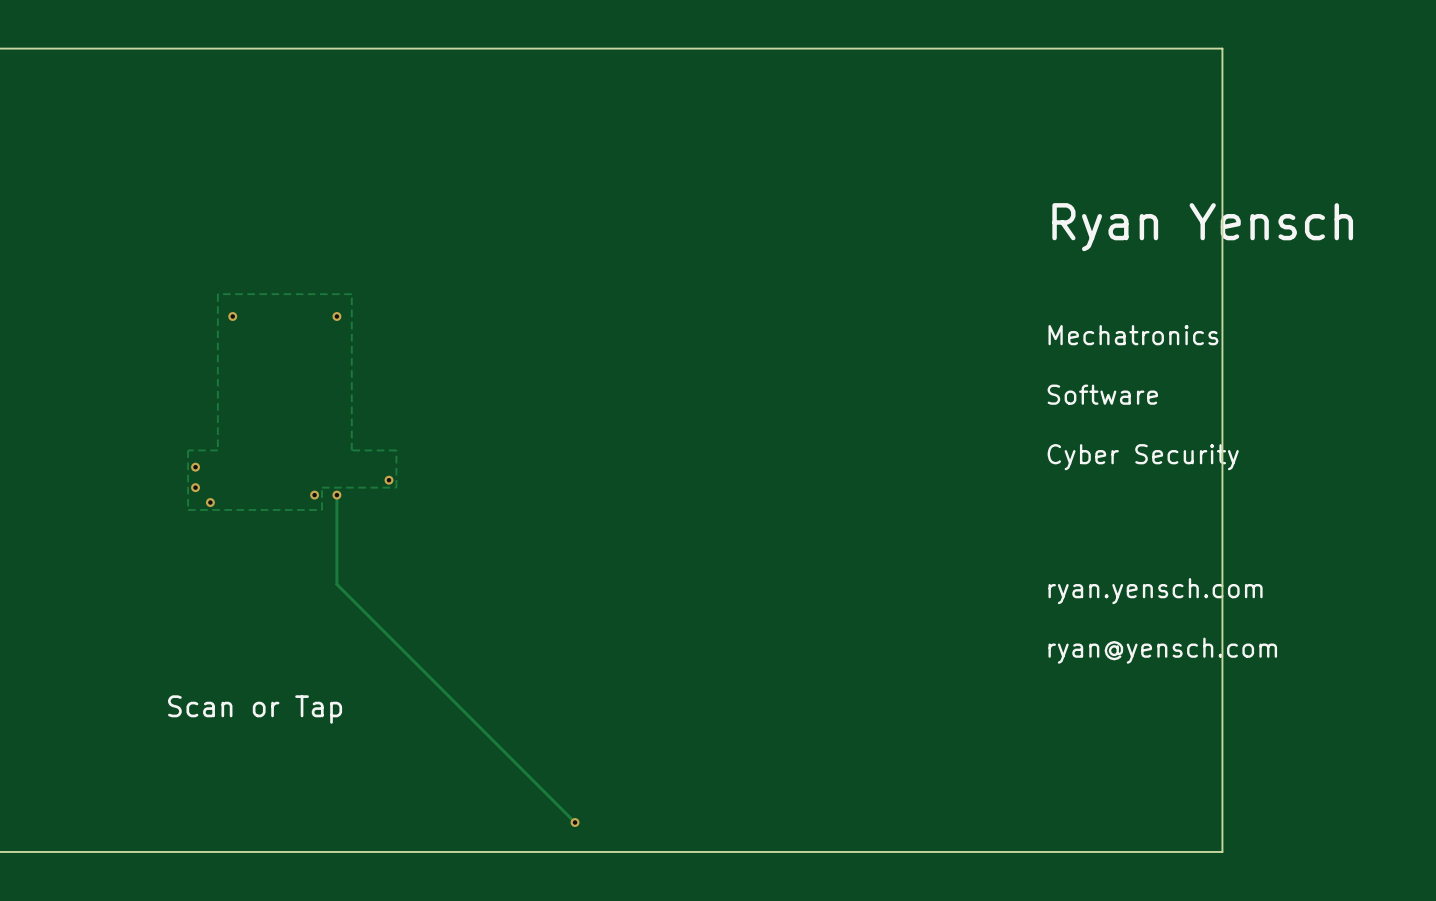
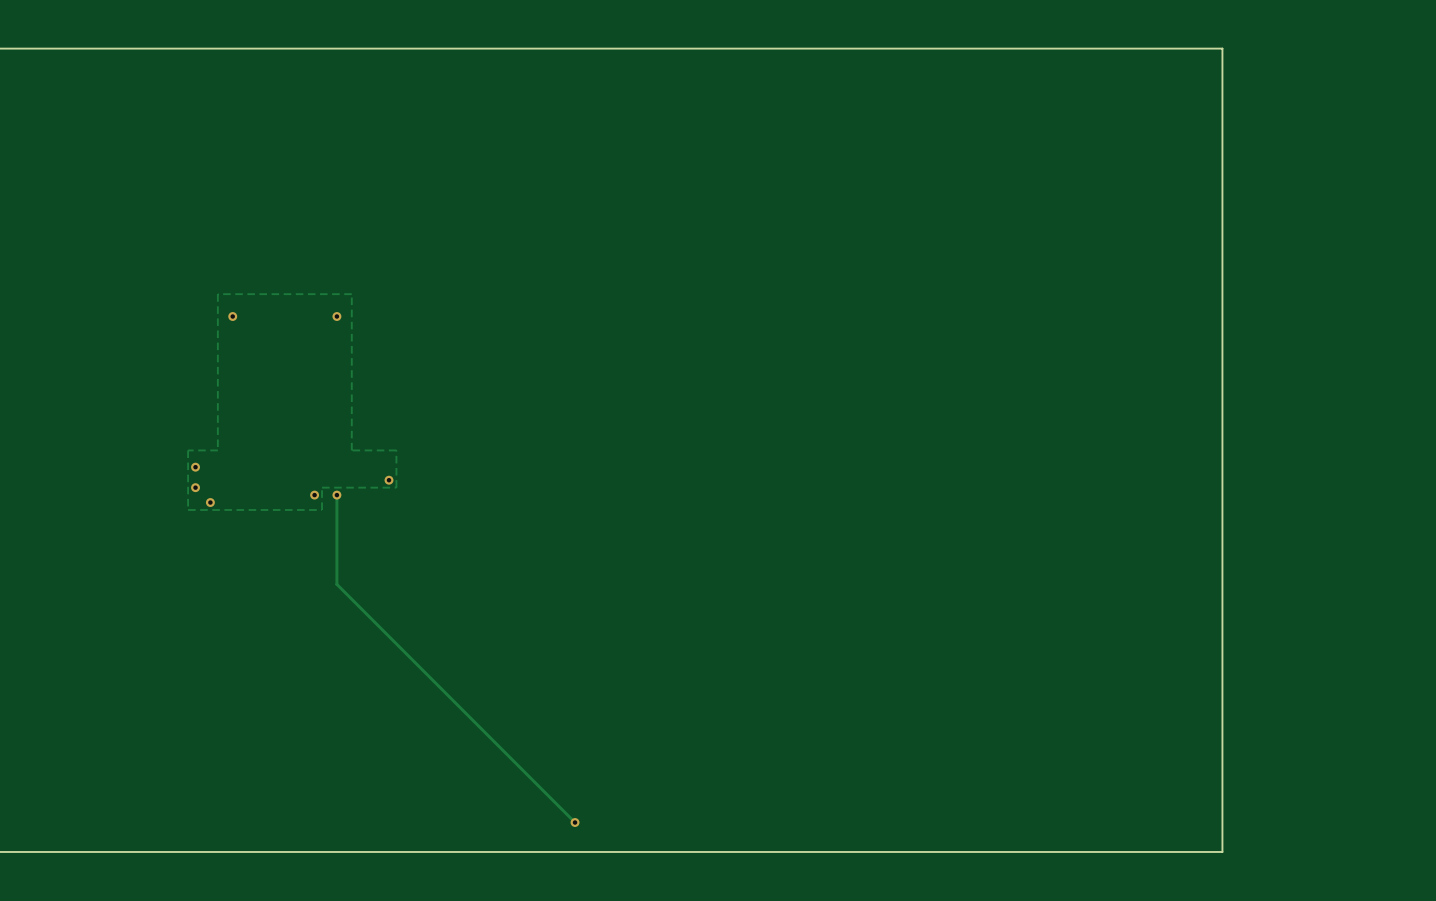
text: Ryan Yensch (1202, 227) -> none
text: Mechatronics (1133, 335) -> none
text: Software (1102, 394) -> none
text: Cyber Security (1143, 457) -> none
text: ryan.yensch.com (1155, 591) -> none
text: ryan@yensch.com (1162, 650) -> none
text: Scan or Tap (255, 709) -> none

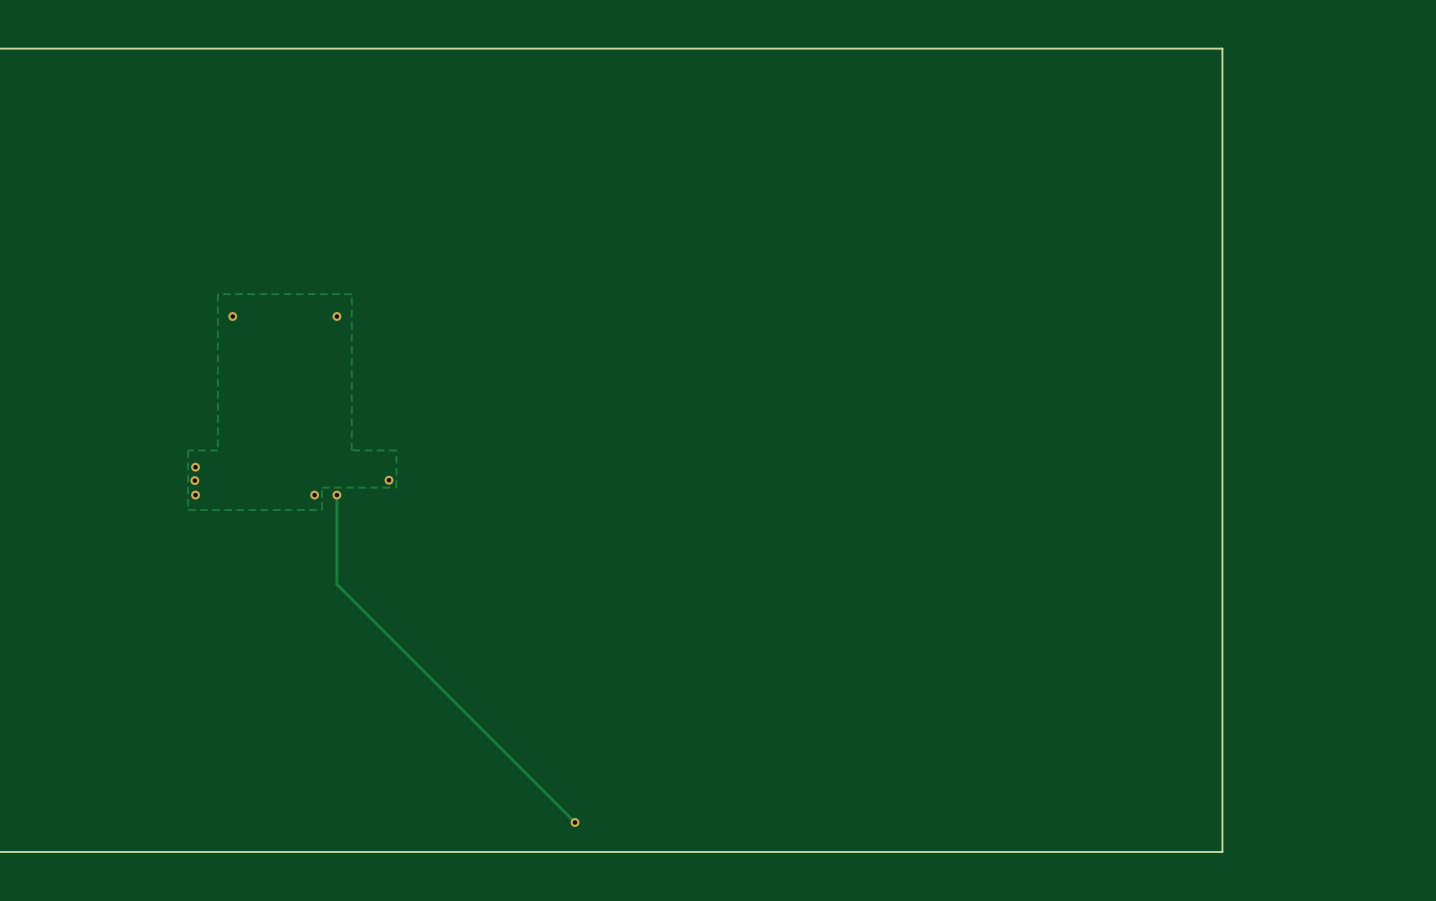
via: none -> (194, 480)
via: (195, 487) -> none
via: none -> (195, 495)
via: (210, 502) -> none

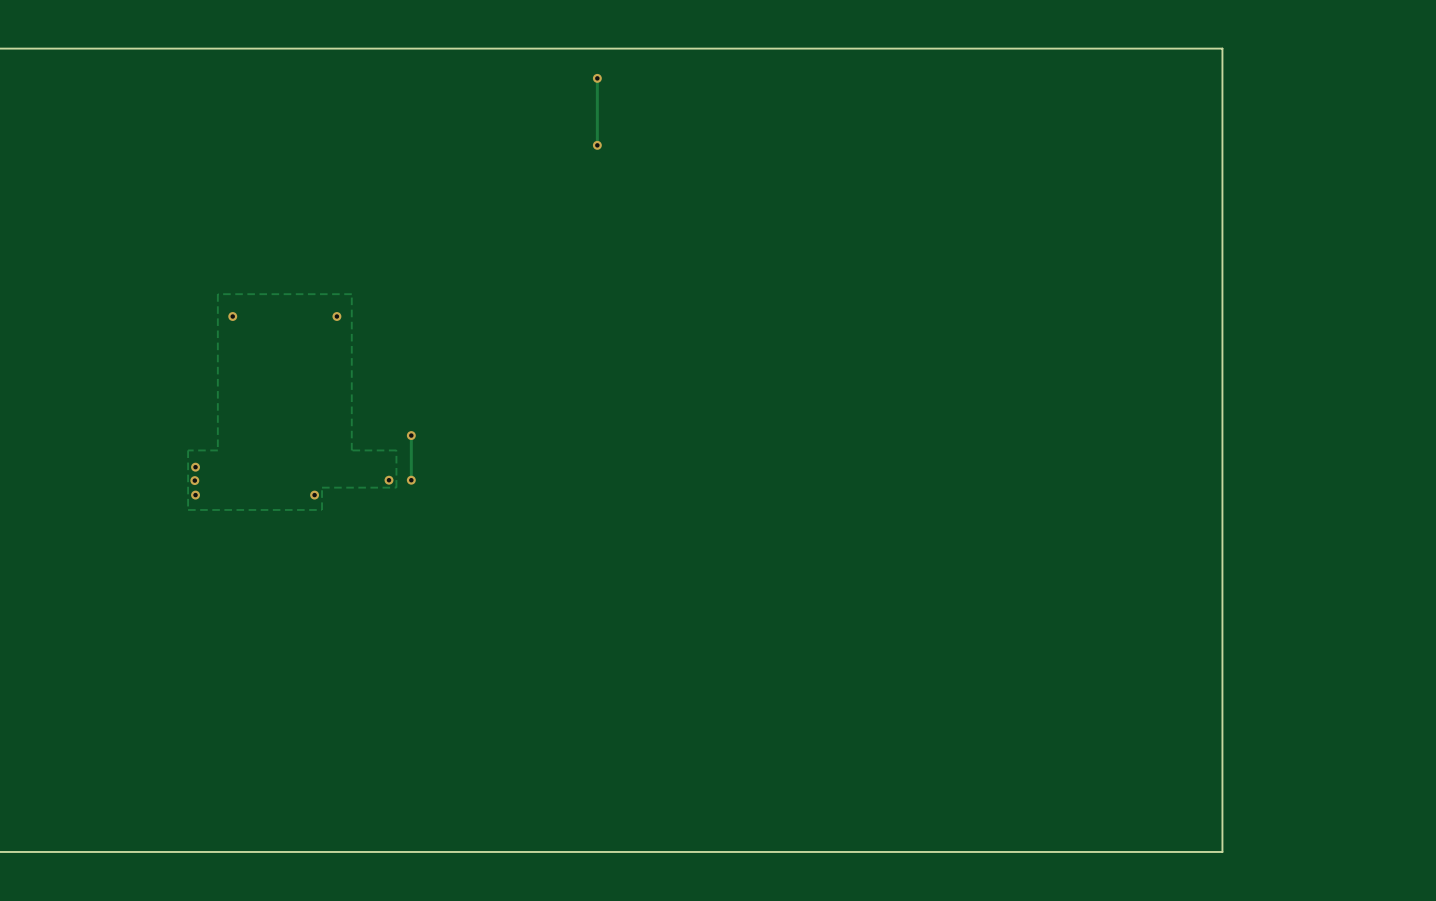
track: none -> (597, 78) (597, 145)
via: none -> (597, 78)
via: none -> (597, 145)
track: none -> (411, 435) (411, 480)
via: none -> (411, 435)
via: none -> (411, 480)
track: (336, 495) (336, 584) (575, 822) -> none
via: (336, 495) -> none
via: (575, 822) -> none

